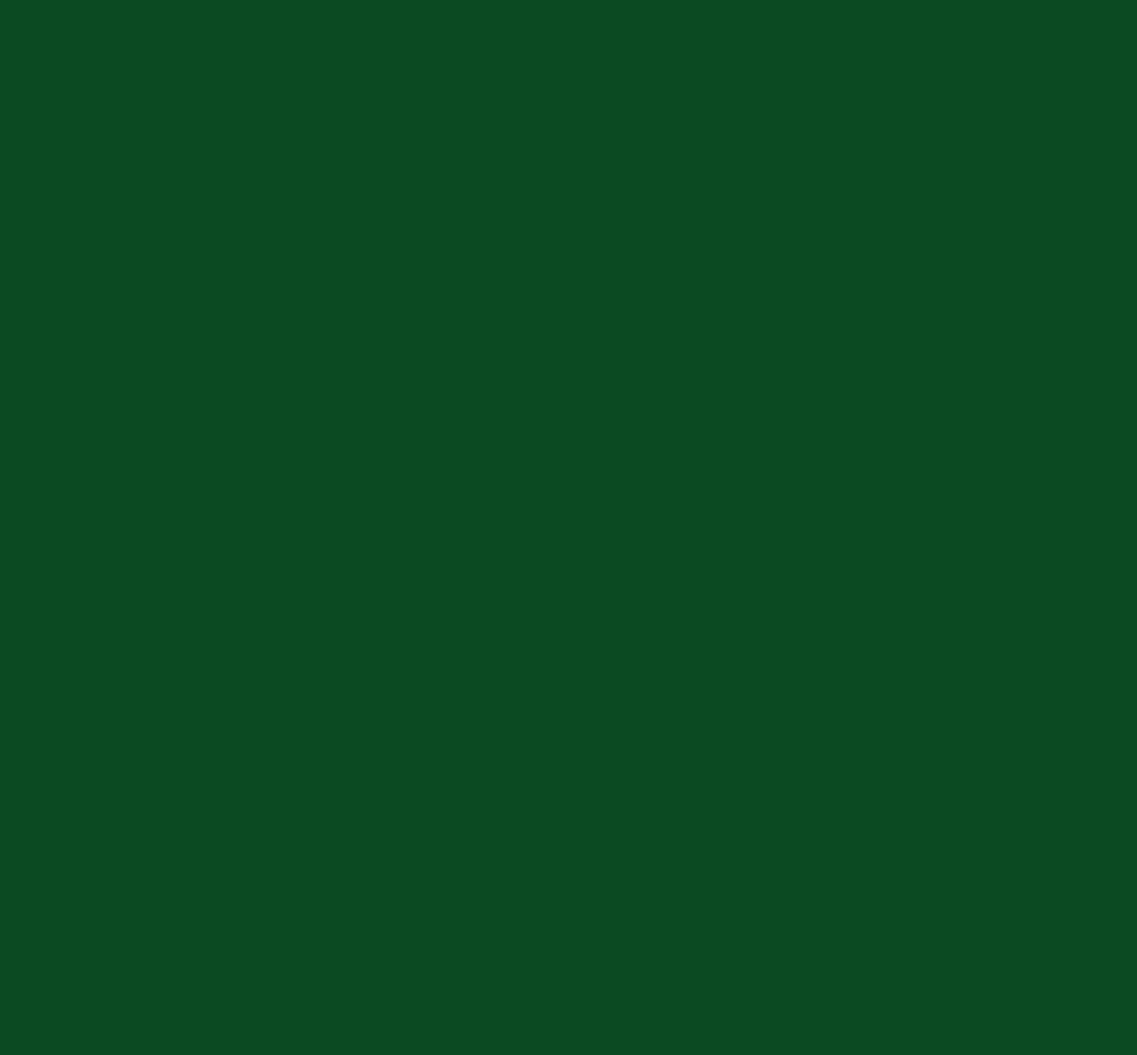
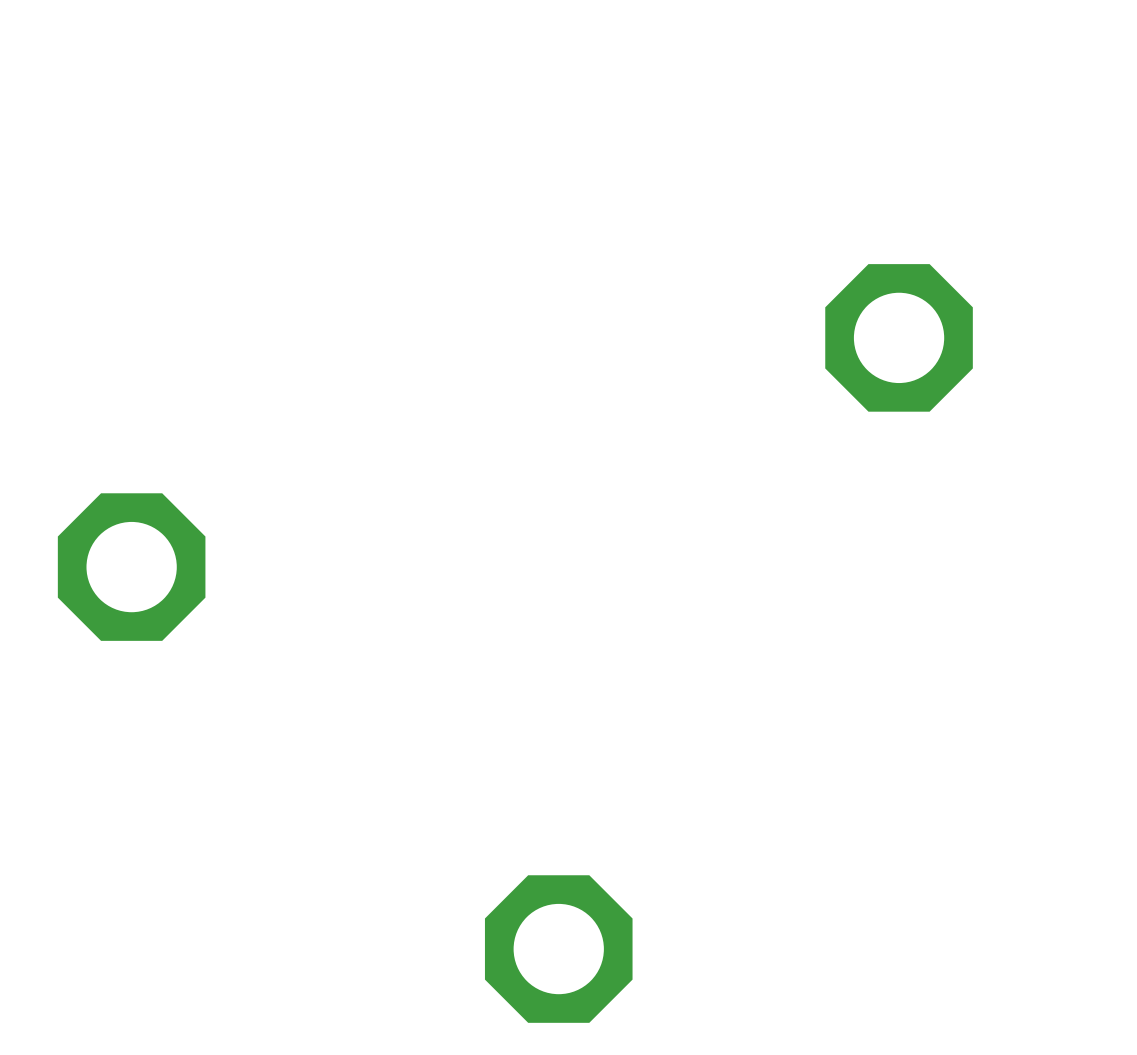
part: none -> (899, 337)
part: none -> (131, 567)
part: none -> (558, 949)

